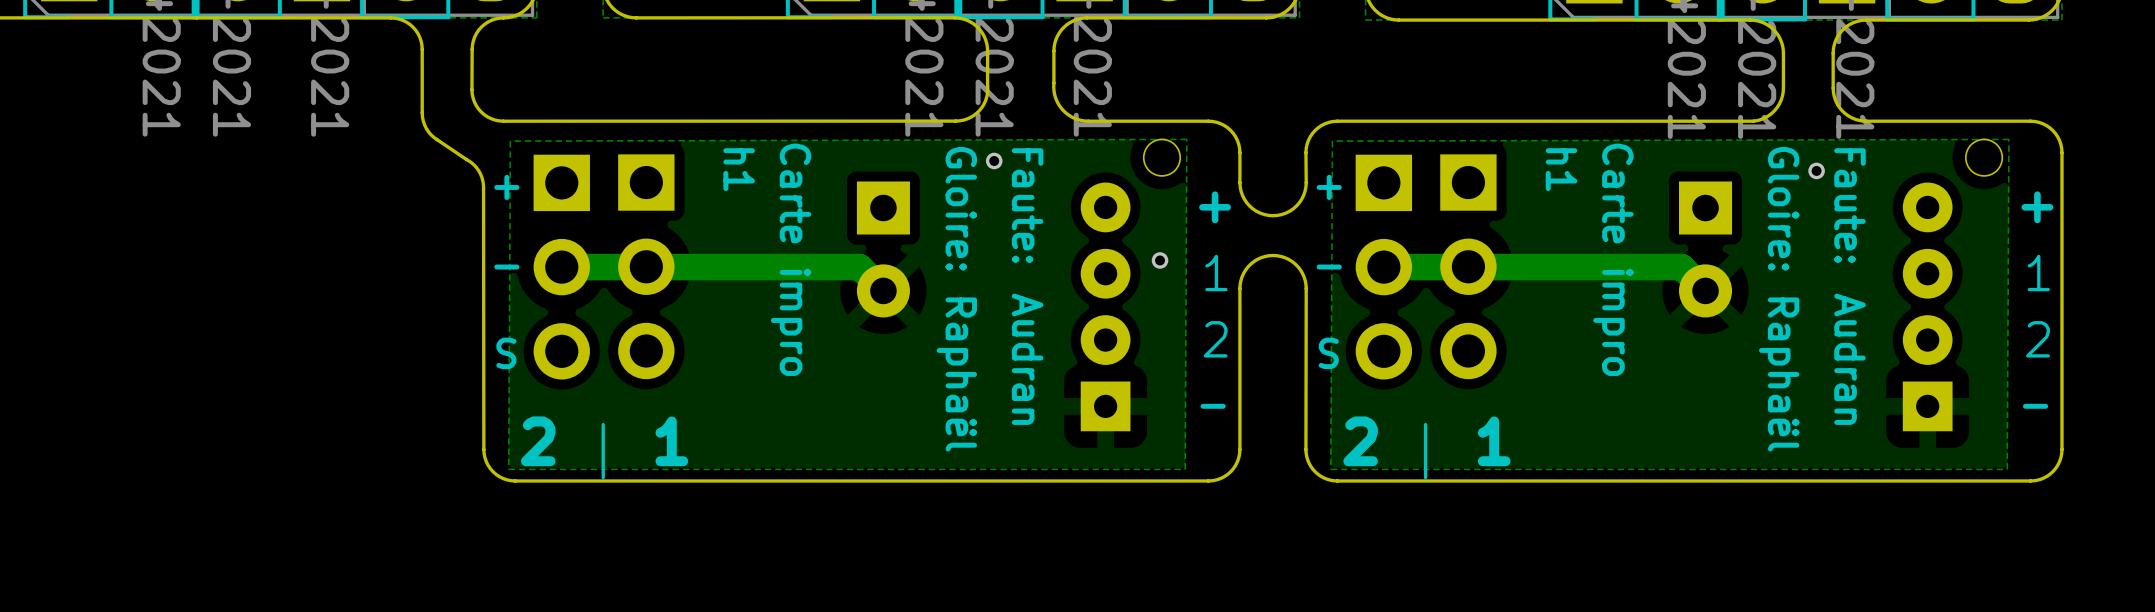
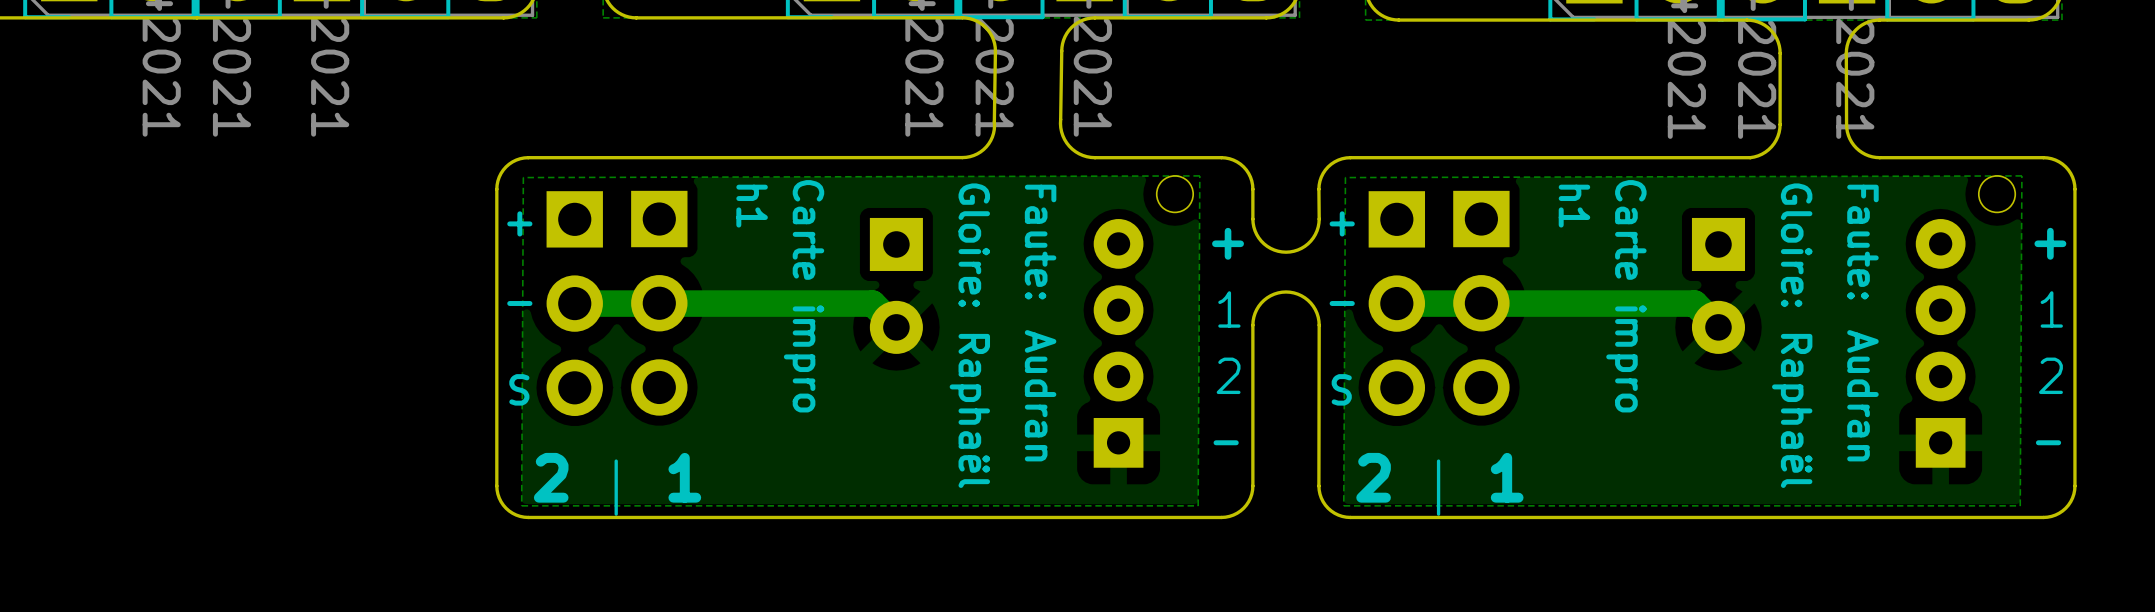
board edge: (390, 17) (398, 18) (409, 24) (415, 30) (421, 41) (422, 112) (426, 128) (433, 137) (472, 163) (478, 171) (482, 180) (484, 453) (490, 468) (496, 474) (507, 479) (1216, 479) (1230, 471) (1235, 465) (1239, 453) (1240, 280) (1251, 263) (1261, 257) (1273, 255) (1284, 257) (1295, 263) (1305, 280) (1306, 453) (1312, 469) (1327, 479) (1337, 480) (2030, 480) (2040, 479) (2050, 474) (2057, 466) (2061, 449) (2061, 152) (2059, 140) (2049, 127) (2034, 121) (1866, 121) (1848, 116) (1840, 108) (1834, 95) (1833, 53) (1835, 42) (1840, 32) (1851, 23) (1862, 20) (1879, 20) -> (954, 17) (969, 18) (982, 25) (992, 36) (995, 47) (993, 133) (986, 146) (973, 155) (962, 157) (528, 157) (516, 160) (506, 166) (499, 177) (496, 189) (496, 485) (499, 498) (506, 508) (516, 515) (528, 517) (1229, 516) (1243, 508) (1248, 501) (1252, 490) (1253, 317) (1258, 306) (1267, 297) (1286, 291) (1304, 297) (1313, 306) (1318, 317) (1319, 490) (1325, 505) (1334, 513) (1342, 516) (2043, 517) (2055, 515) (2062, 510) (2070, 501) (2074, 485) (2074, 189) (2072, 177) (2062, 164) (2047, 157) (1879, 157) (1868, 155) (1859, 150) (1851, 142) (1846, 128) (1846, 49) (1849, 38) (1856, 29) (1868, 21) (1879, 20)
board edge: (954, 17) (968, 21) (977, 27) (985, 39) (987, 50) (987, 89) (985, 100) (973, 115) (955, 121) (495, 120) (481, 111) (473, 97) (472, 45) (474, 37) (481, 27) (491, 20) (503, 17) -> (390, 17) (503, 17)
board edge: (1094, 17) (1079, 18) (1069, 22) (1061, 30) (1055, 40) (1054, 91) (1062, 109) (1072, 117) (1084, 120) (1208, 121) (1224, 125) (1233, 133) (1238, 144) (1240, 186) (1244, 199) (1256, 211) (1273, 215) (1289, 211) (1301, 199) (1305, 186) (1305, 152) (1308, 140) (1318, 127) (1333, 121) (1753, 121) (1761, 119) (1774, 110) (1782, 96) (1783, 49) (1778, 35) (1770, 27) (1761, 21) (1746, 20) -> (1094, 17) (1083, 19) (1074, 25) (1066, 33) (1062, 43) (1060, 123) (1062, 135) (1069, 146) (1079, 153) (1090, 157) (1221, 157) (1233, 160) (1246, 170) (1251, 181) (1253, 223) (1256, 234) (1270, 248) (1286, 252) (1301, 248) (1315, 234) (1318, 223) (1318, 189) (1321, 177) (1331, 164) (1342, 158) (1750, 157) (1761, 154) (1774, 143) (1779, 128) (1779, 49) (1776, 38) (1770, 29) (1761, 23) (1746, 20)
zone outline: (1186, 139) (510, 141) (508, 469) (1185, 469) (1186, 139) -> (1199, 175) (523, 177) (521, 505) (1198, 505) (1199, 175)
zone outline: (2008, 139) (1332, 141) (1330, 469) (2007, 469) (2008, 139) -> (2021, 175) (1345, 177) (1343, 505) (2020, 505) (2021, 175)
via: (994, 160) -> none
text position: h1 (739, 169) -> h1 (752, 206)
text position: h1 (1561, 169) -> h1 (1574, 206)
via: (1816, 170) -> none
text position: + (506, 187) -> + (519, 223)
text position: + (1329, 187) -> + (1342, 223)
text position: Faute: (1027, 205) -> Faute: (1040, 242)
text position: Faute: (1849, 205) -> Faute: (1862, 242)
text position: Gloire: (961, 208) -> Gloire: (974, 245)
text position: Gloire: (1783, 208) -> Gloire: (1796, 245)
part position: (883, 249) -> (896, 285)
part position: (1705, 249) -> (1718, 285)
text position: Carte impro (791, 259) -> Carte impro (804, 296)
text position: Carte impro (1613, 259) -> Carte impro (1626, 296)
via: (1160, 260) -> none
part position: (646, 266) -> (659, 303)
part position: (1468, 266) -> (1481, 303)
text position: - (506, 267) -> - (519, 303)
track: (561, 267) (859, 267) (883, 290) -> (574, 303) (872, 303) (896, 327)
part position: (561, 267) -> (574, 303)
text position: - (1329, 267) -> - (1342, 303)
track: (1383, 267) (1681, 267) (1705, 290) -> (1396, 303) (1694, 303) (1718, 327)
part position: (1383, 267) -> (1396, 303)
drawing position: (1215, 274) -> (1228, 310)
drawing position: (2037, 274) -> (2050, 310)
part position: (1130, 284) -> (1143, 321)
part position: (1952, 284) -> (1965, 321)
text position: S (506, 353) -> S (519, 389)
text position: S (1328, 353) -> S (1341, 389)
text position: Audran (1027, 359) -> Audran (1040, 395)
text position: Audran (1849, 359) -> Audran (1862, 395)
text position: Raphaël (956, 374) -> Raphaël (969, 410)
text position: Raphaël (1779, 374) -> Raphaël (1792, 410)
text position: - (1213, 406) -> - (1226, 442)
text position: - (2035, 406) -> - (2048, 442)
line: (603, 424) (603, 477) -> (616, 461) (616, 514)
line: (1425, 424) (1425, 477) -> (1438, 461) (1438, 514)
text position: 2 (538, 441) -> 2 (551, 477)
text position: 1 (671, 441) -> 1 (684, 477)
text position: 2 (1360, 441) -> 2 (1373, 477)
text position: 1 (1494, 441) -> 1 (1507, 477)

